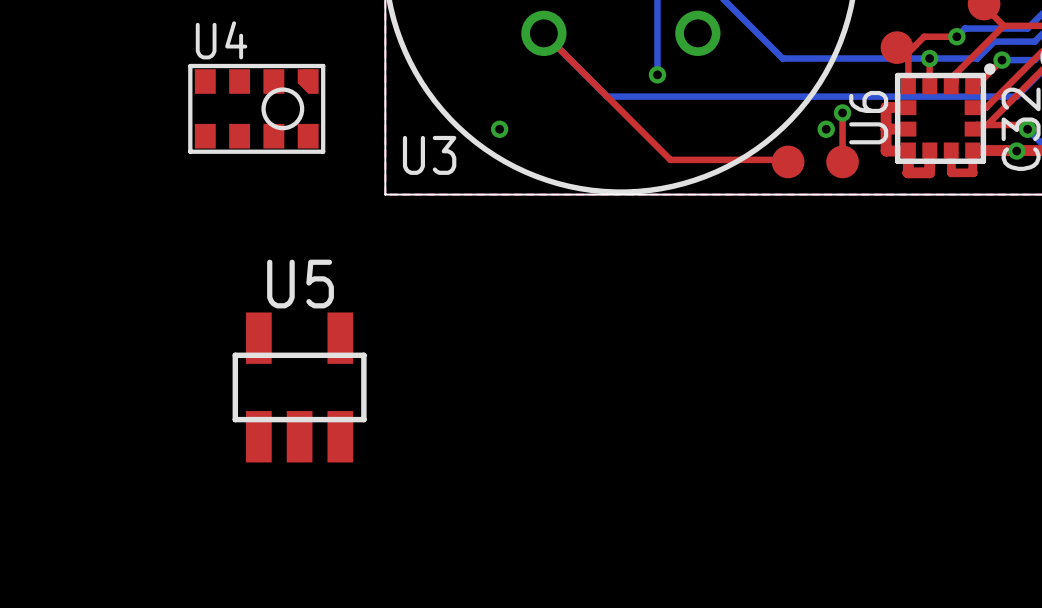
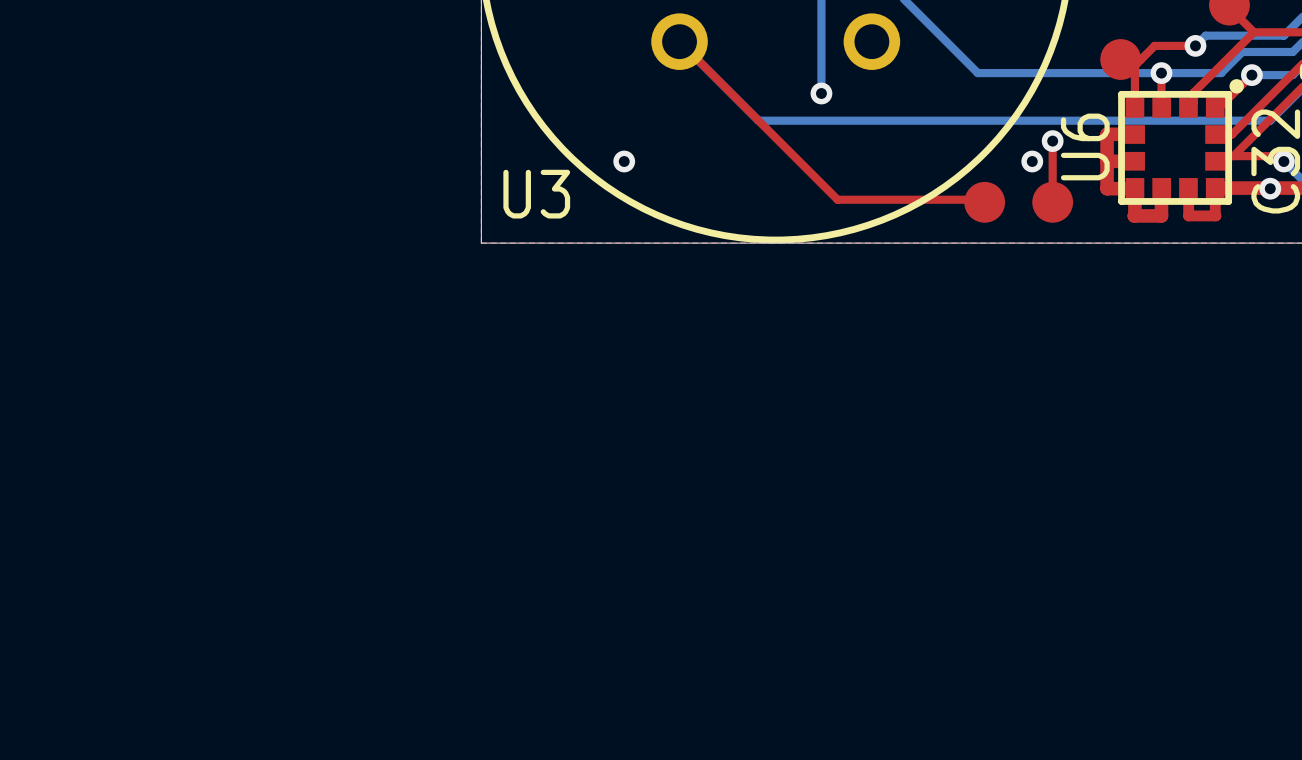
U4: (256, 108) -> none
U5: (299, 387) -> none

